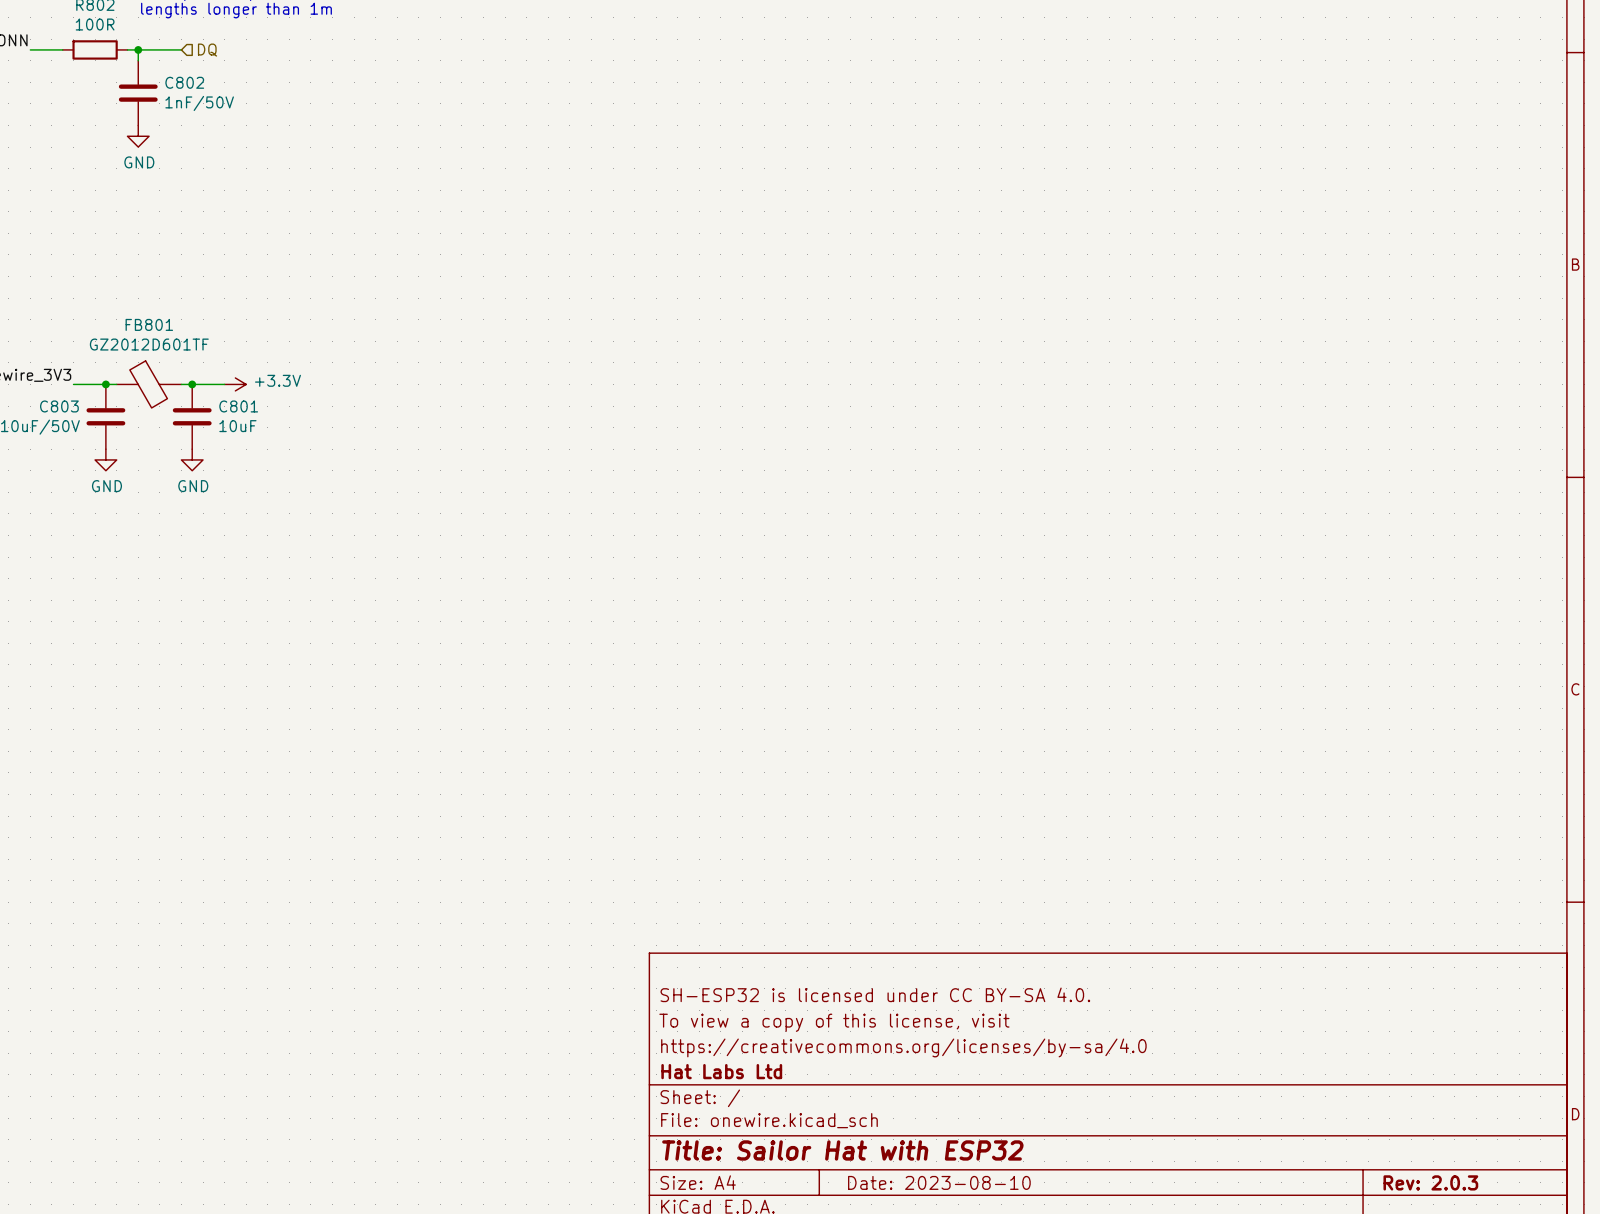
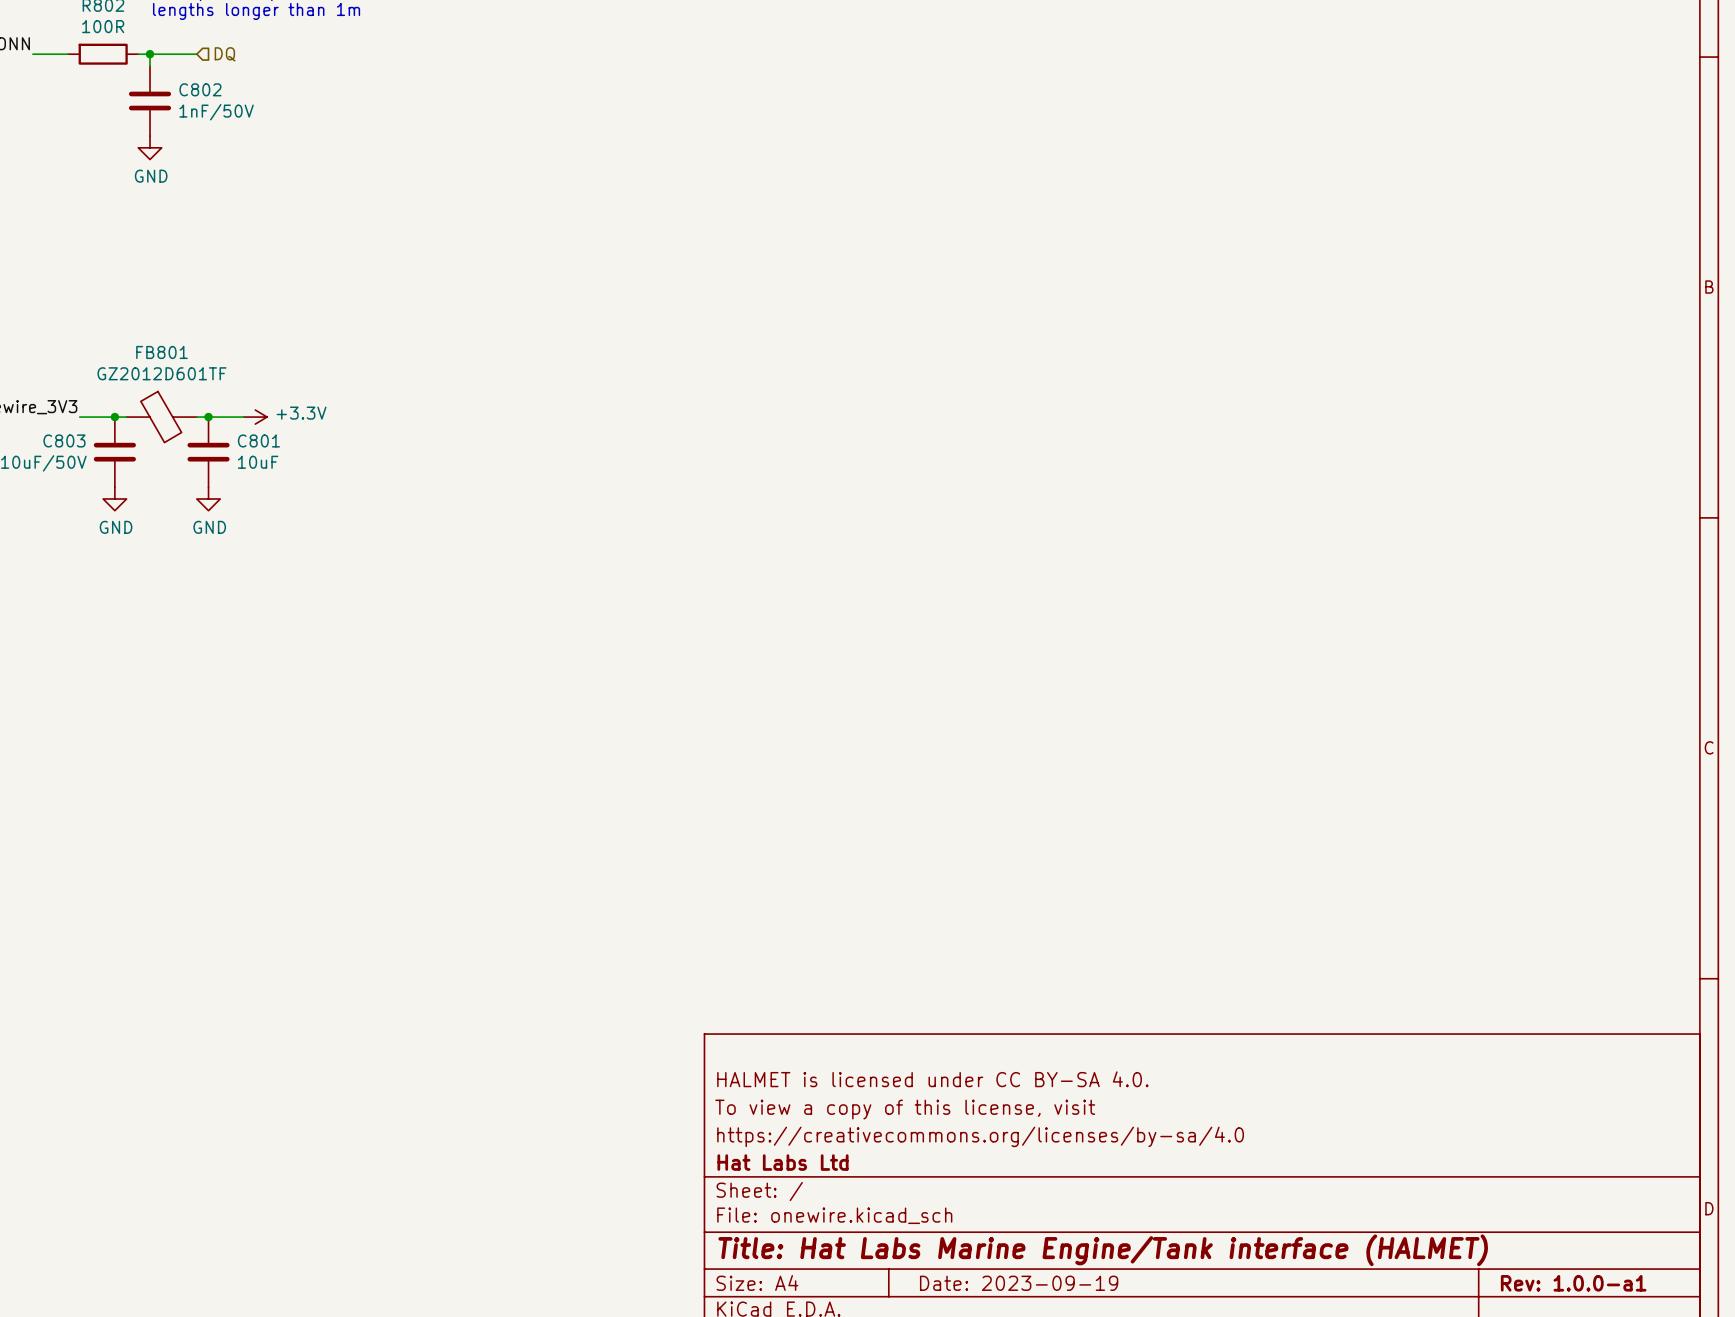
title block: SH-ESP32 is licensed under CC BY-SA 4.0. (875, 994) -> HALMET is licensed under CC BY-SA 4.0. (932, 1079)
title block: Title: Sailor Hat with ESP32 (842, 1150) -> Title: Hat Labs Marine Engine/Tank interface (HALMET) (1103, 1250)
title block: Date: 2023-08-10 (939, 1182) -> Date: 2023-09-19 (1019, 1283)
title block: Rev: 2.0.3 (1430, 1182) -> Rev: 1.0.0-a1 (1573, 1283)

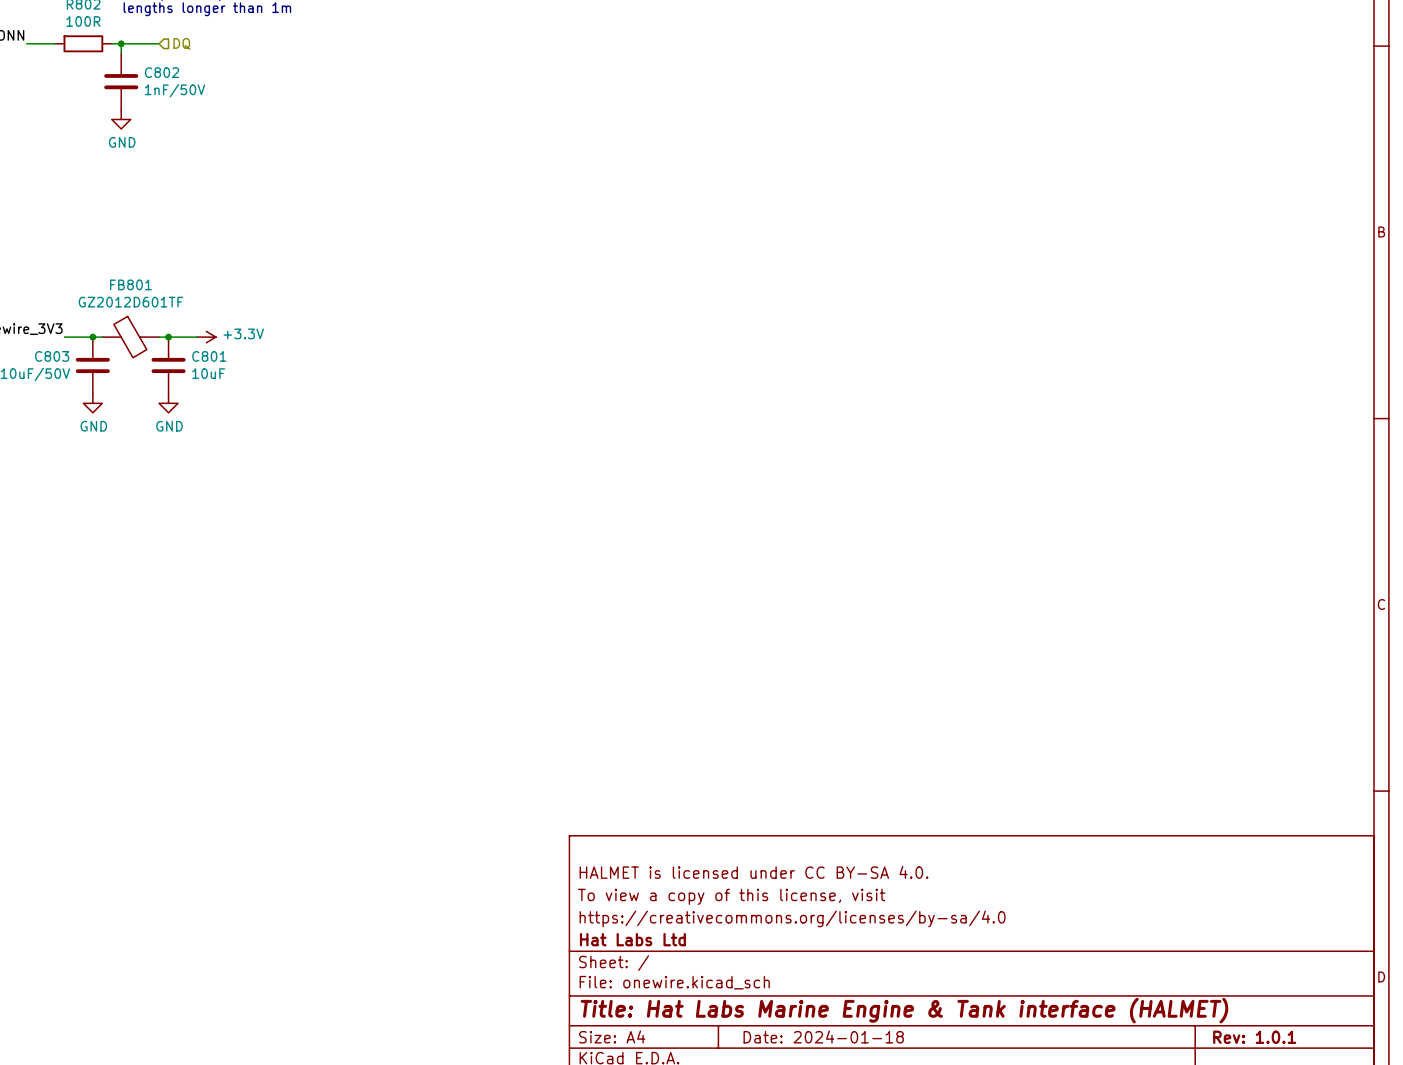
title block: Title: Hat Labs Marine Engine/Tank interface (HALMET) (1103, 1250) -> Title: Hat Labs Marine Engine & Tank interface (HALMET) (904, 1010)
title block: Date: 2023-09-19 (1019, 1283) -> Date: 2024-01-18 (823, 1037)
title block: Rev: 1.0.0-a1 (1573, 1283) -> Rev: 1.0.1 (1254, 1037)

